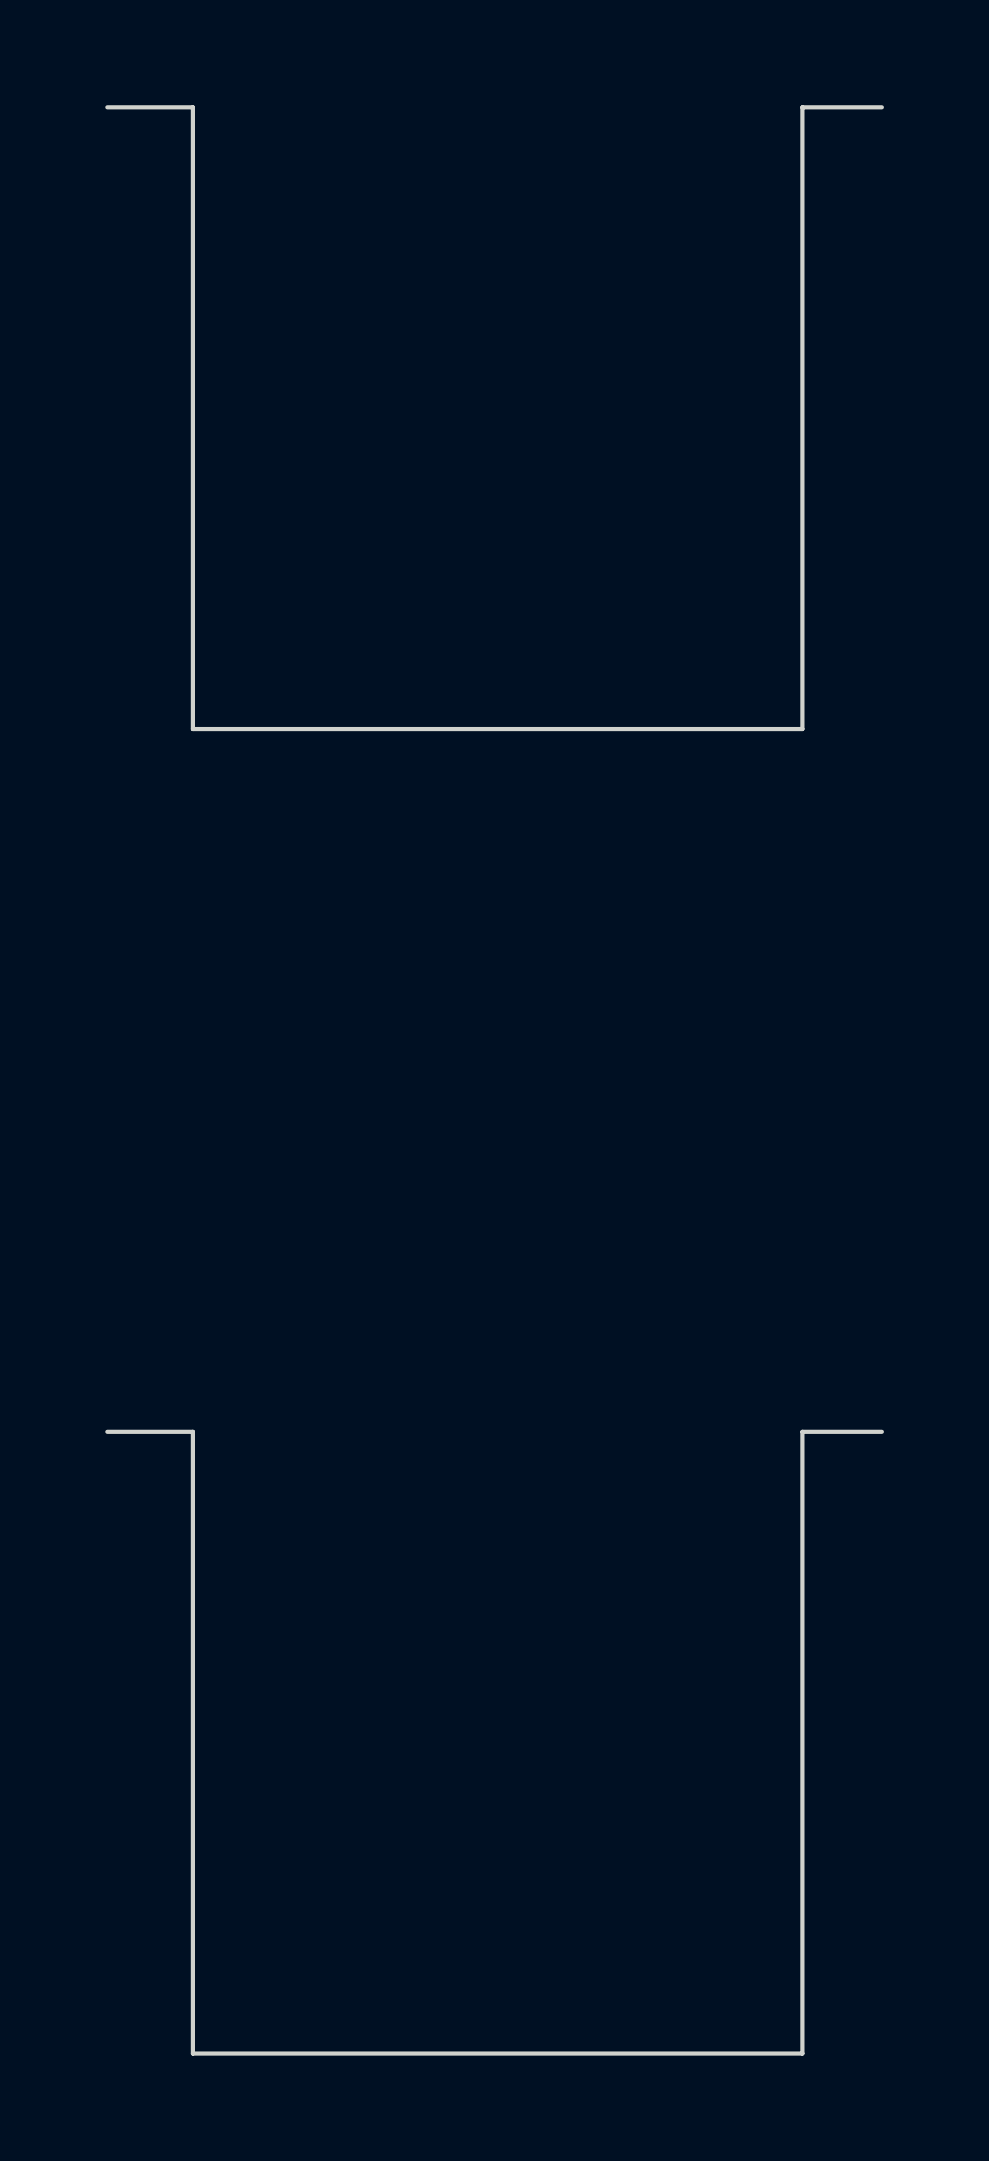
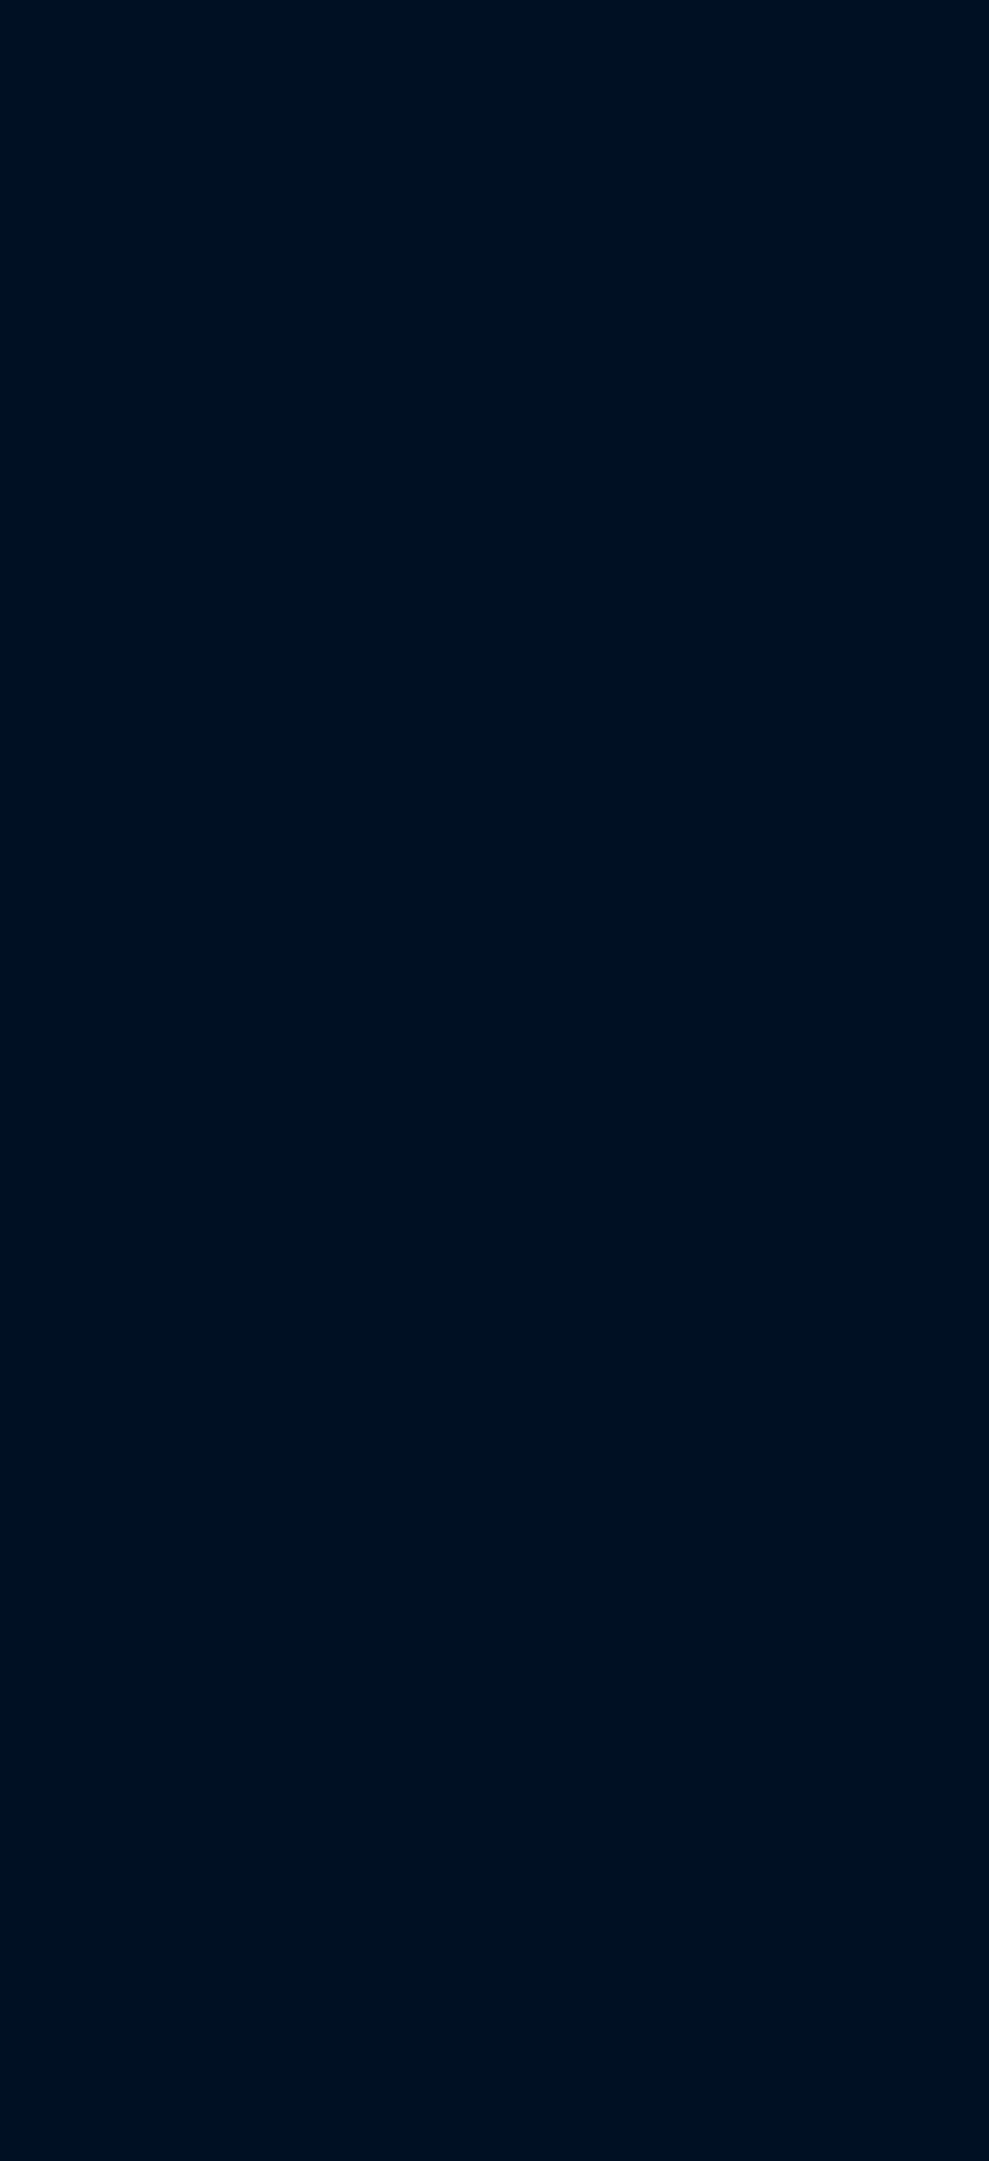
part: (494, 418) -> none
part: (494, 1742) -> none

